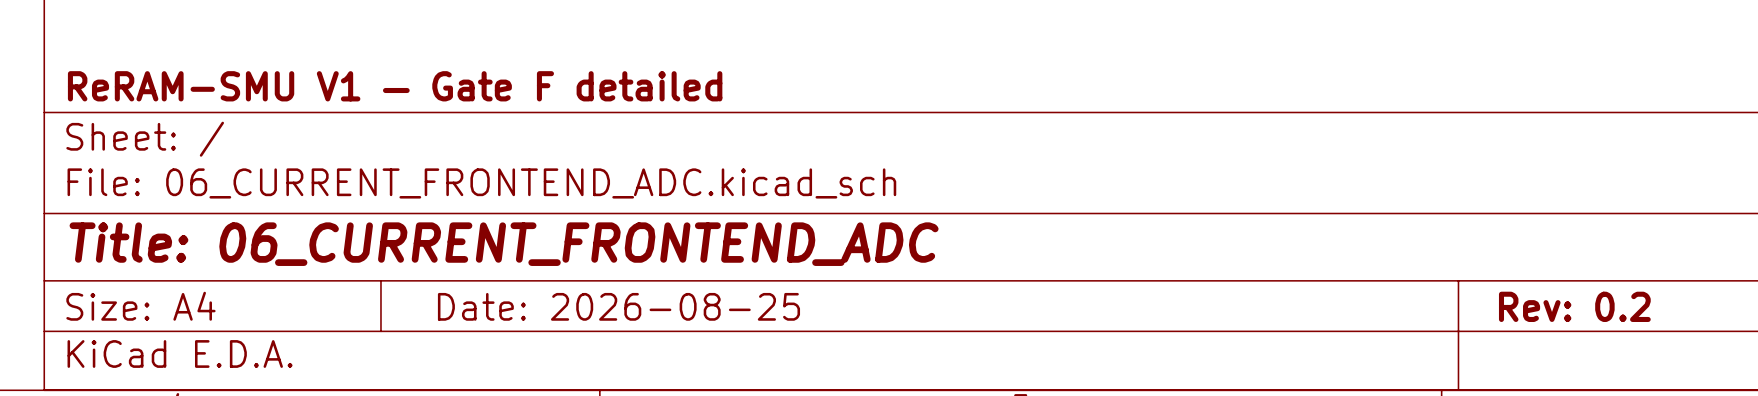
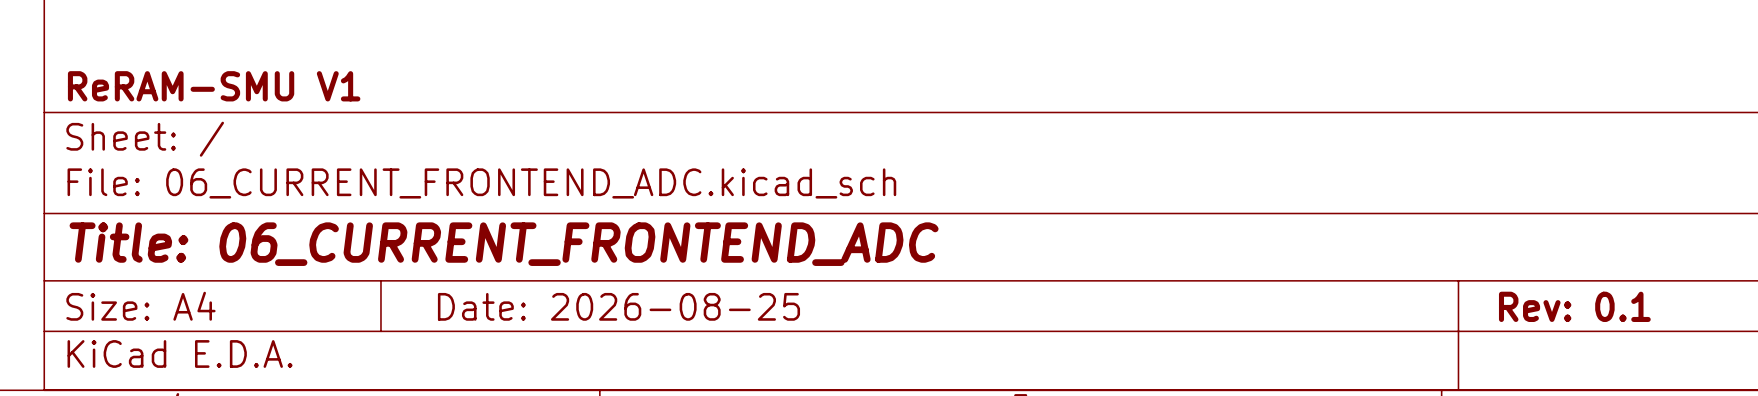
title block: ReRAM-SMU V1 — Gate F detailed (395, 86) -> ReRAM-SMU V1 (214, 86)
title block: Rev: 0.2 (1574, 306) -> Rev: 0.1 (1574, 306)

